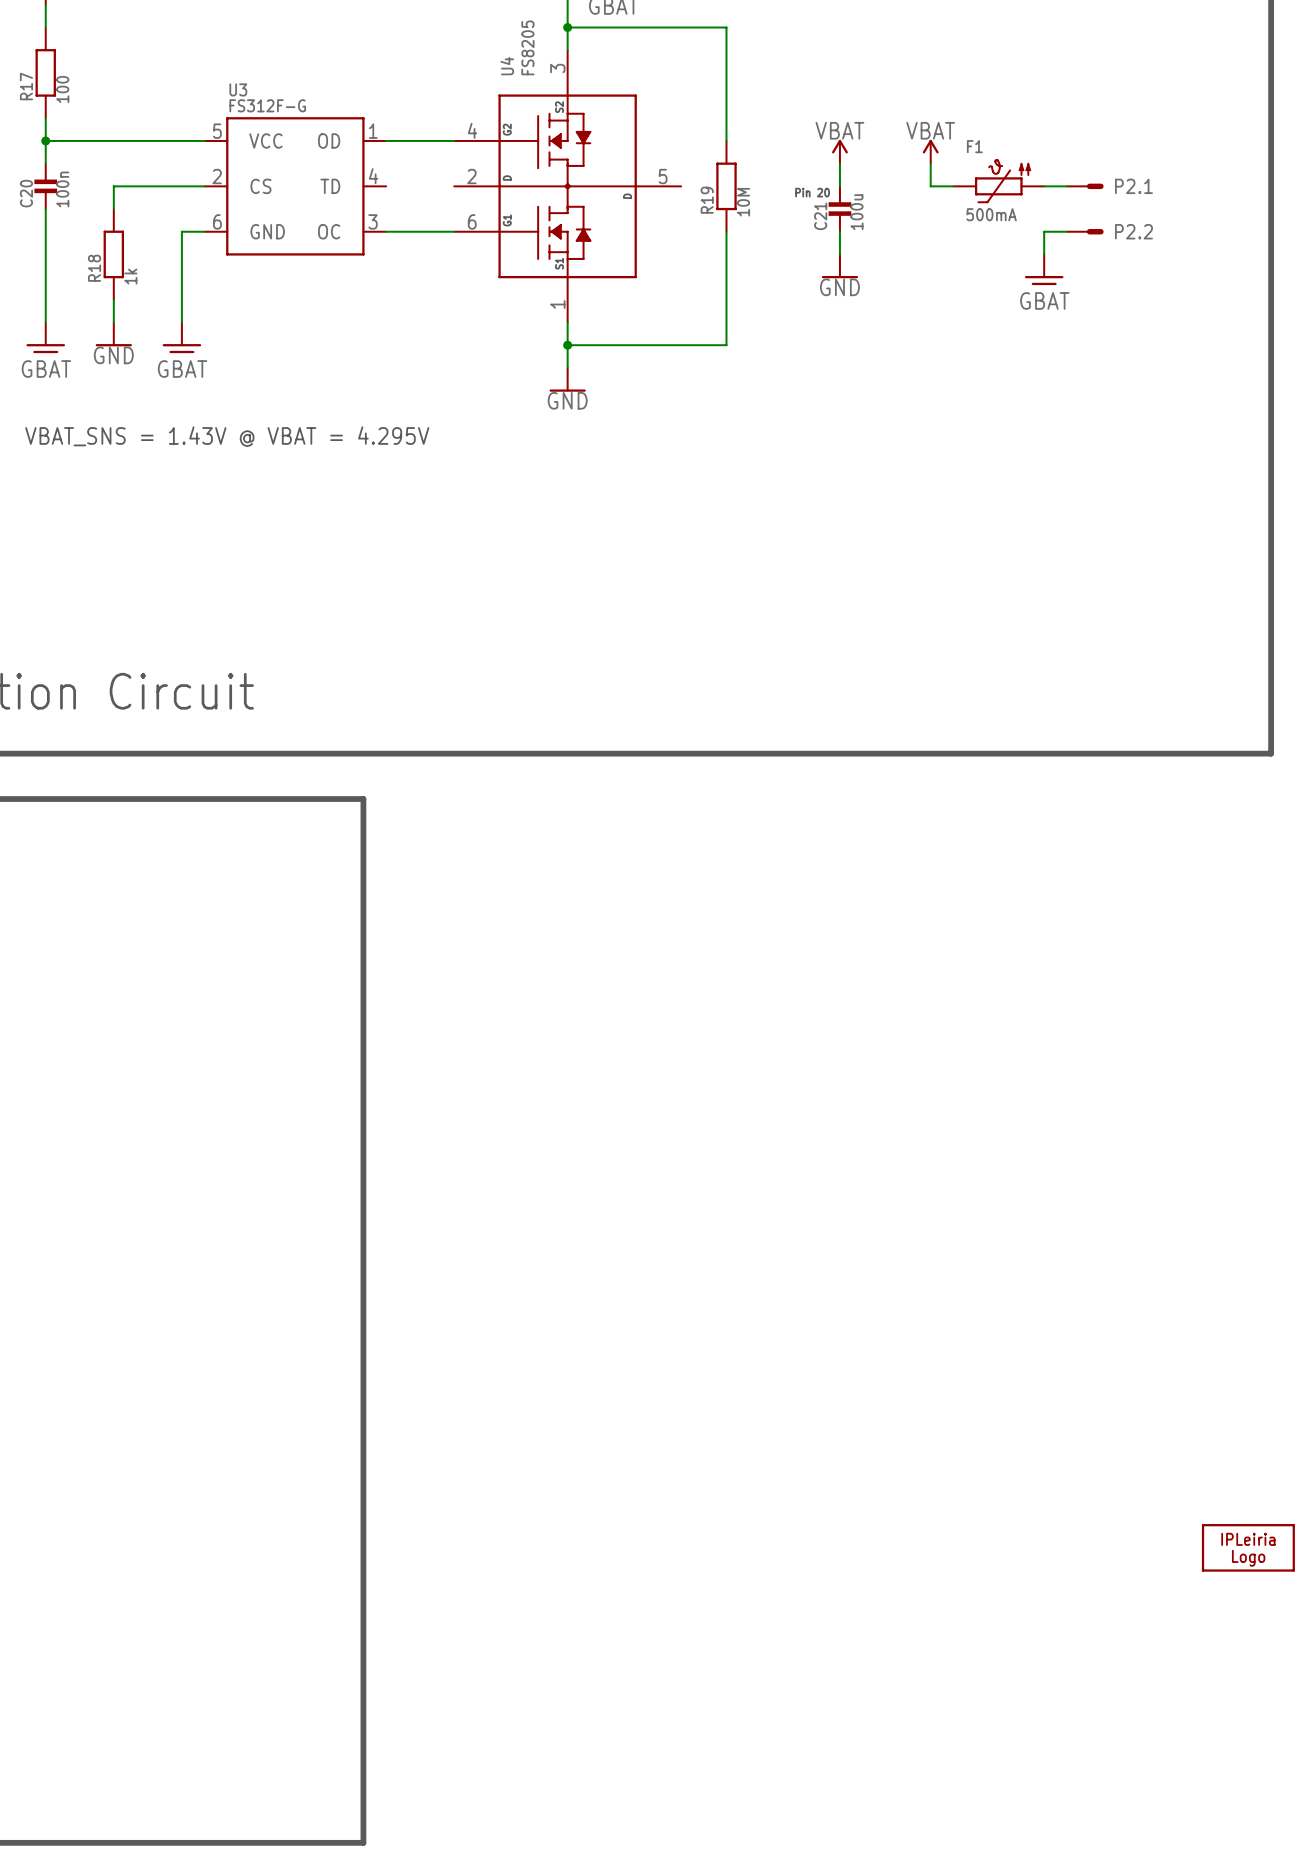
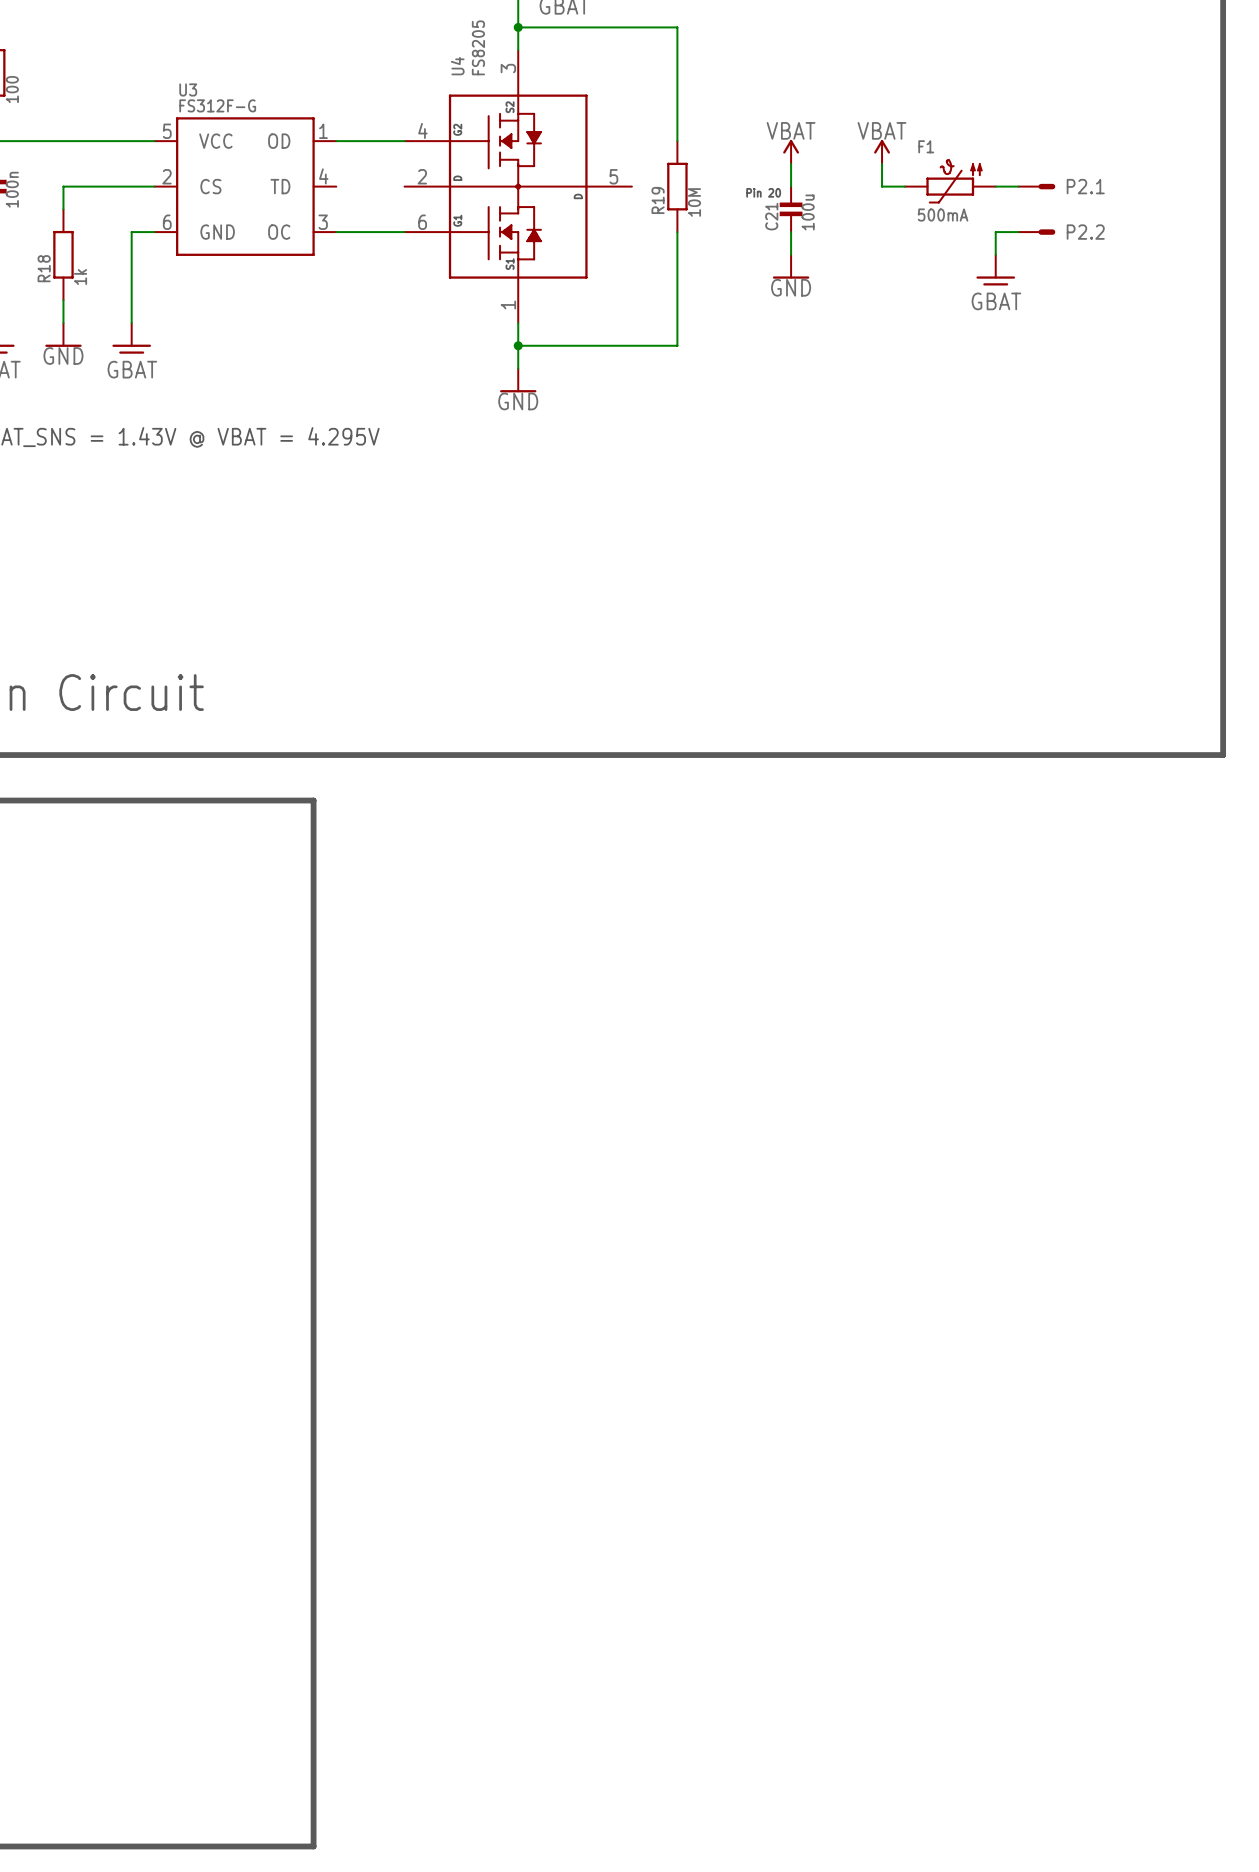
part: (1248, 1547) -> none

